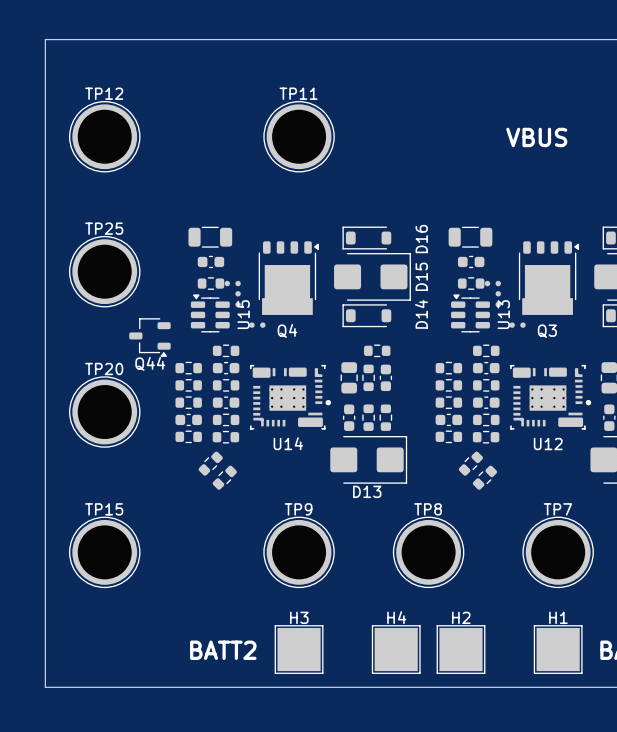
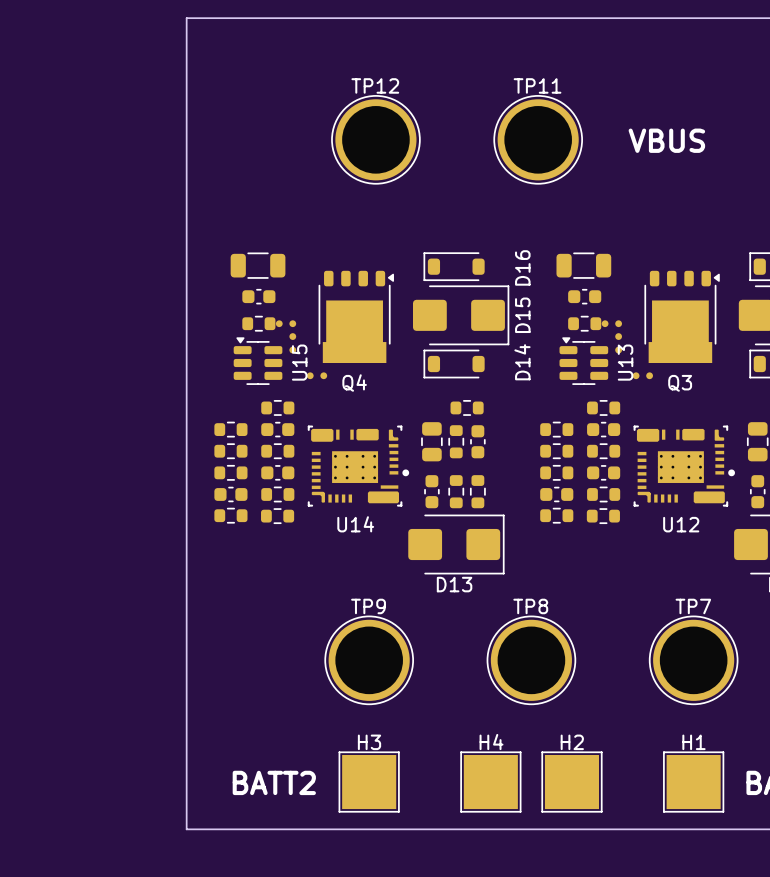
board edge: (153, 39) (45, 39) (45, 687) (153, 687) -> (186, 18) (186, 829)
TP12 position: (104, 136) -> (375, 139)
TP11 position: (299, 136) -> (538, 139)
TP25: (104, 271) -> none
Q44: (149, 337) -> none
TP20: (104, 412) -> none
part: (210, 463) -> none
part: (470, 463) -> none
part: (224, 477) -> none
part: (484, 477) -> none
TP15: (104, 552) -> none

